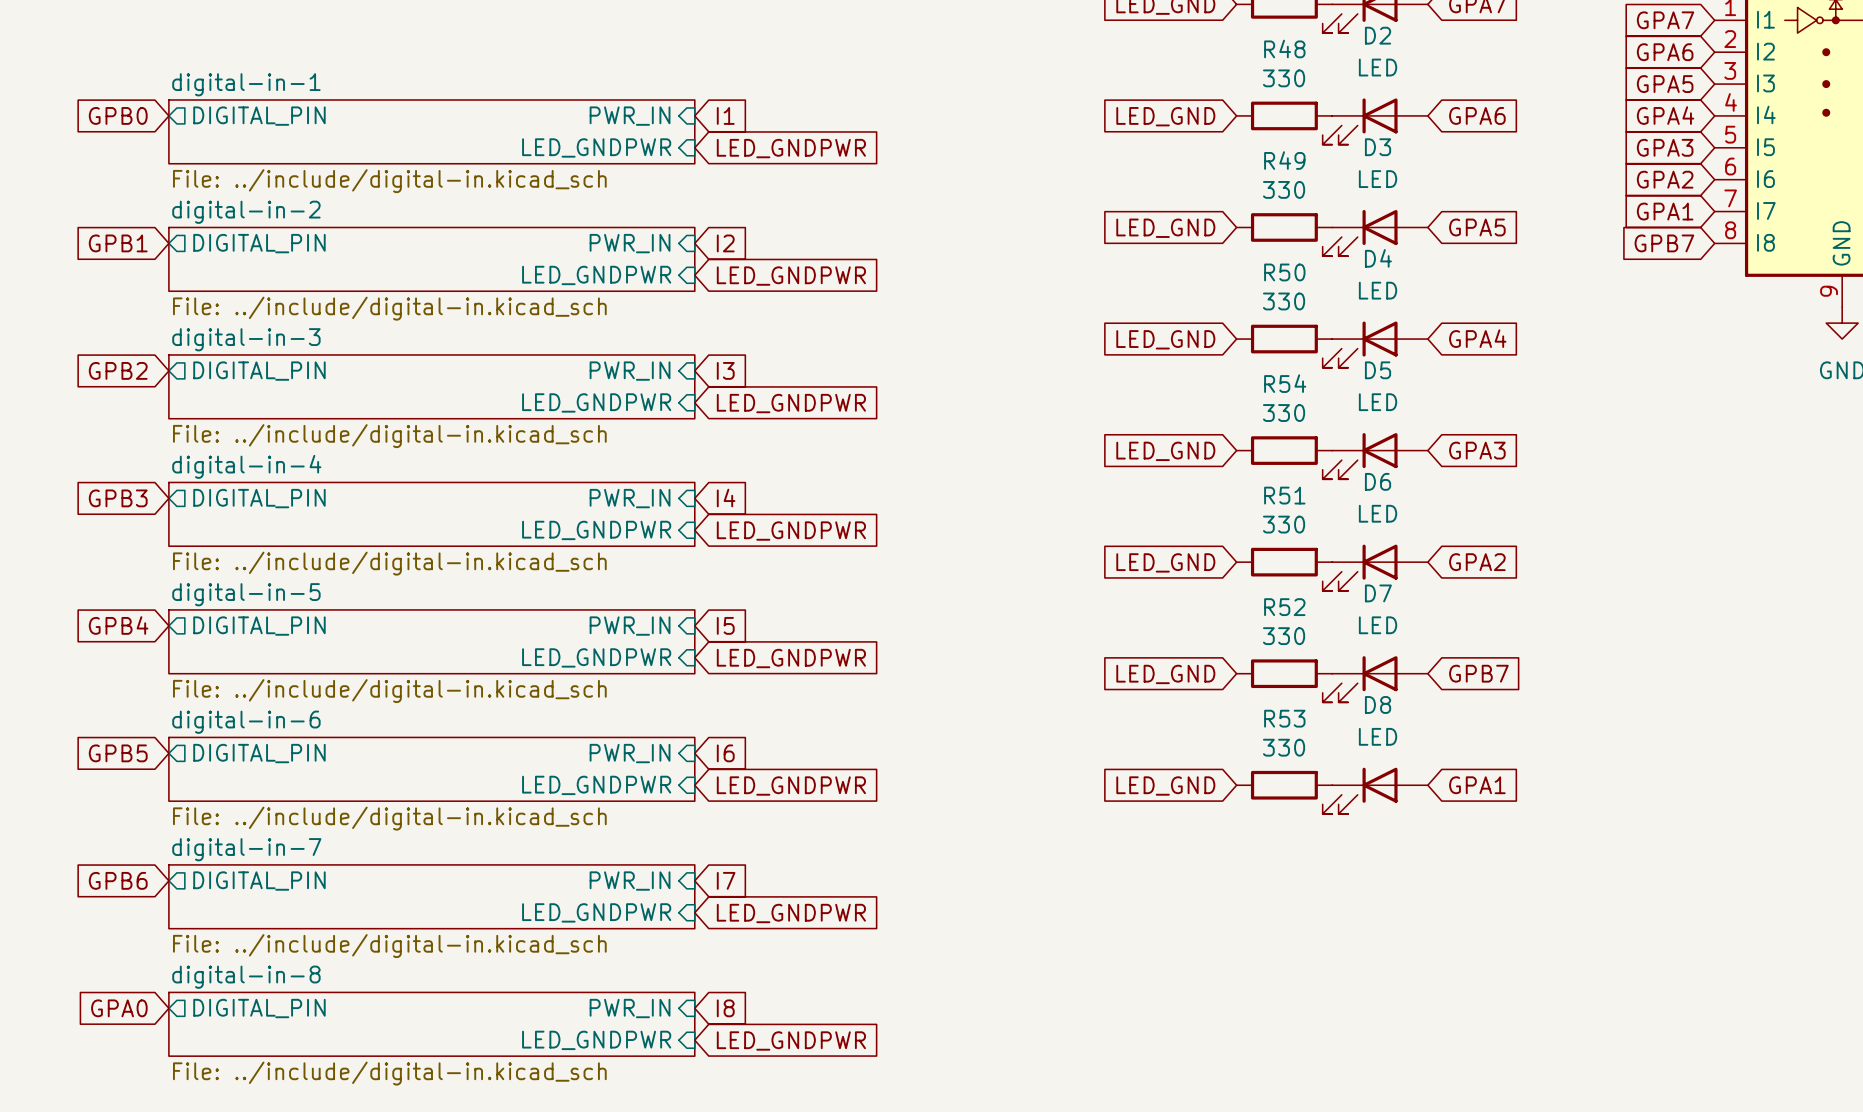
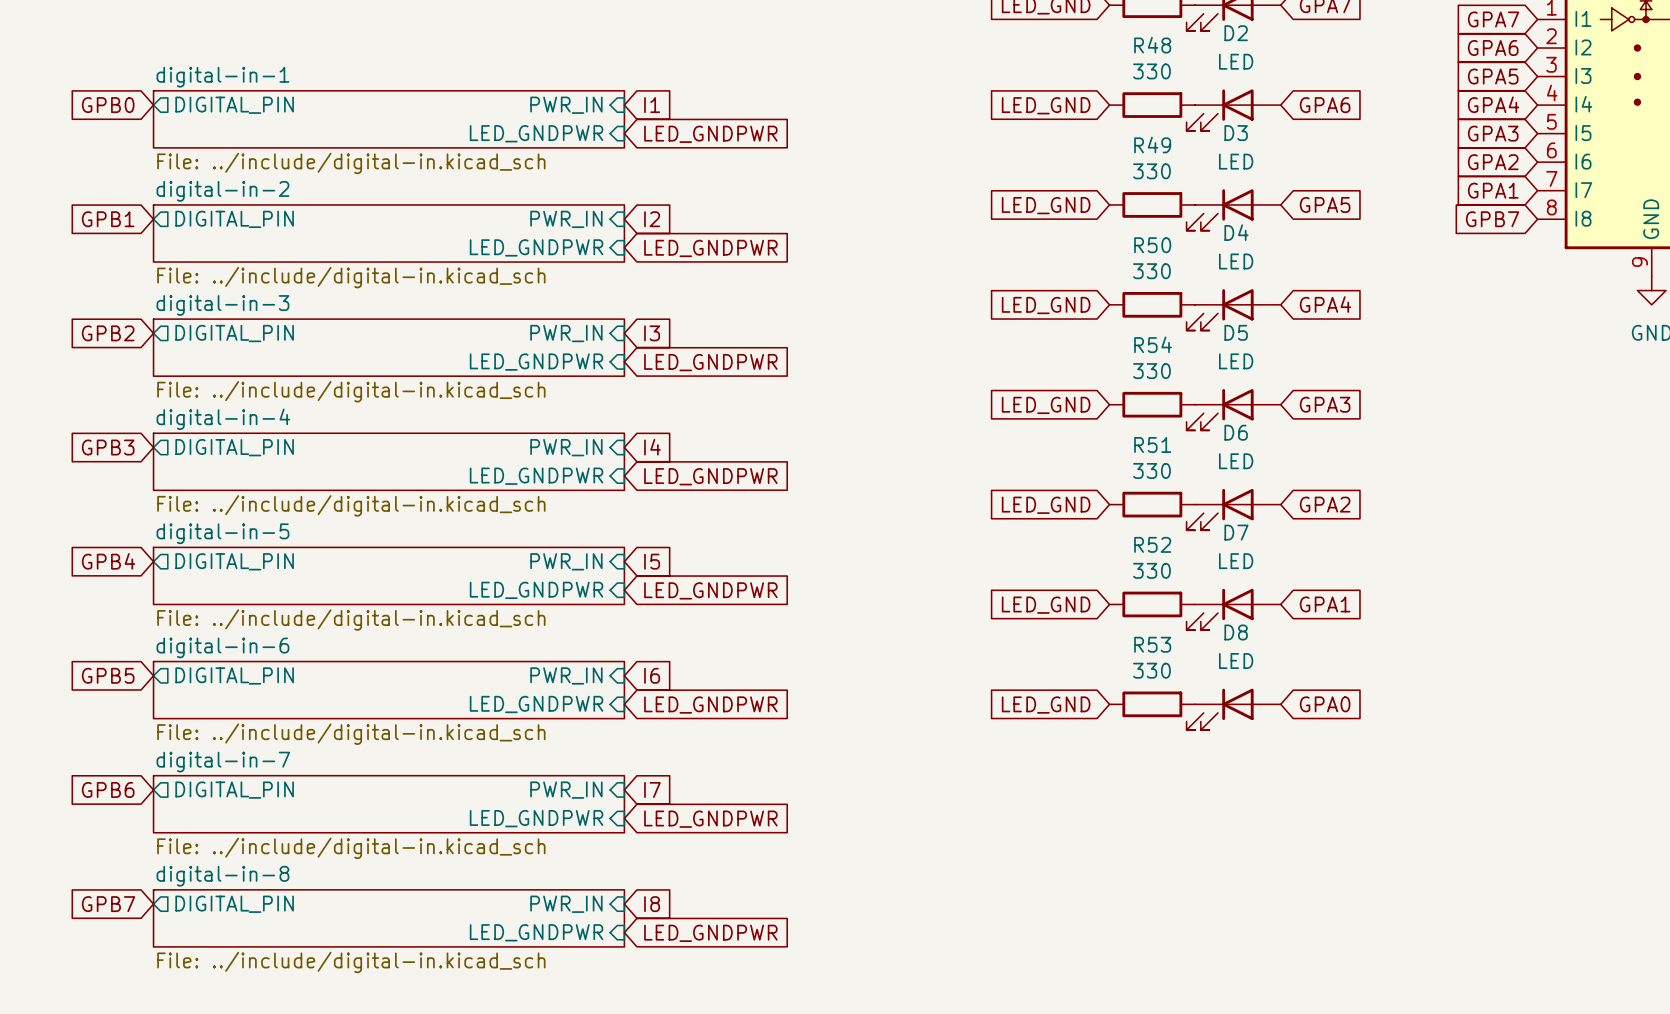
global label: GPB7 (1478, 673) -> GPA1 (1325, 604)
global label: GPA1 (1477, 785) -> GPA0 (1325, 704)
global label: GPA0 (119, 1008) -> GPB7 (108, 904)

